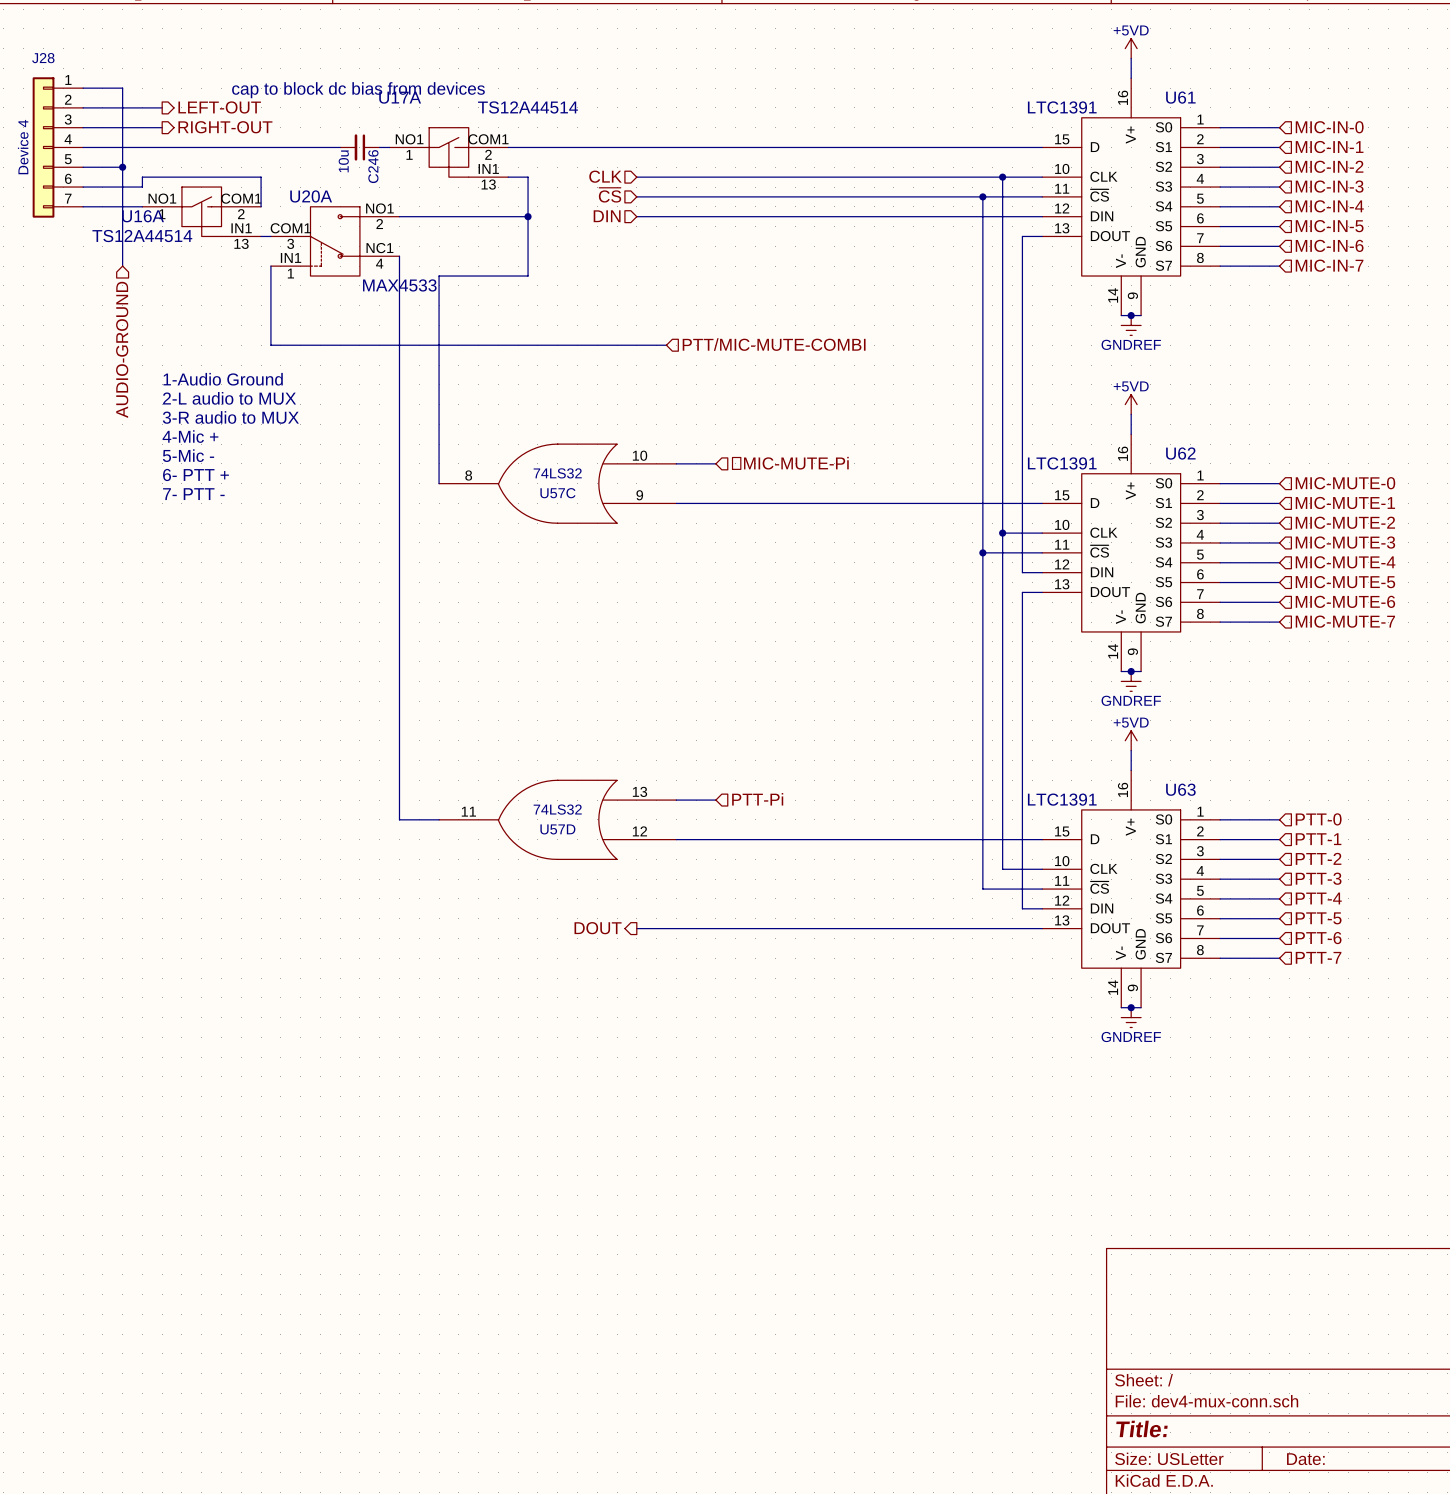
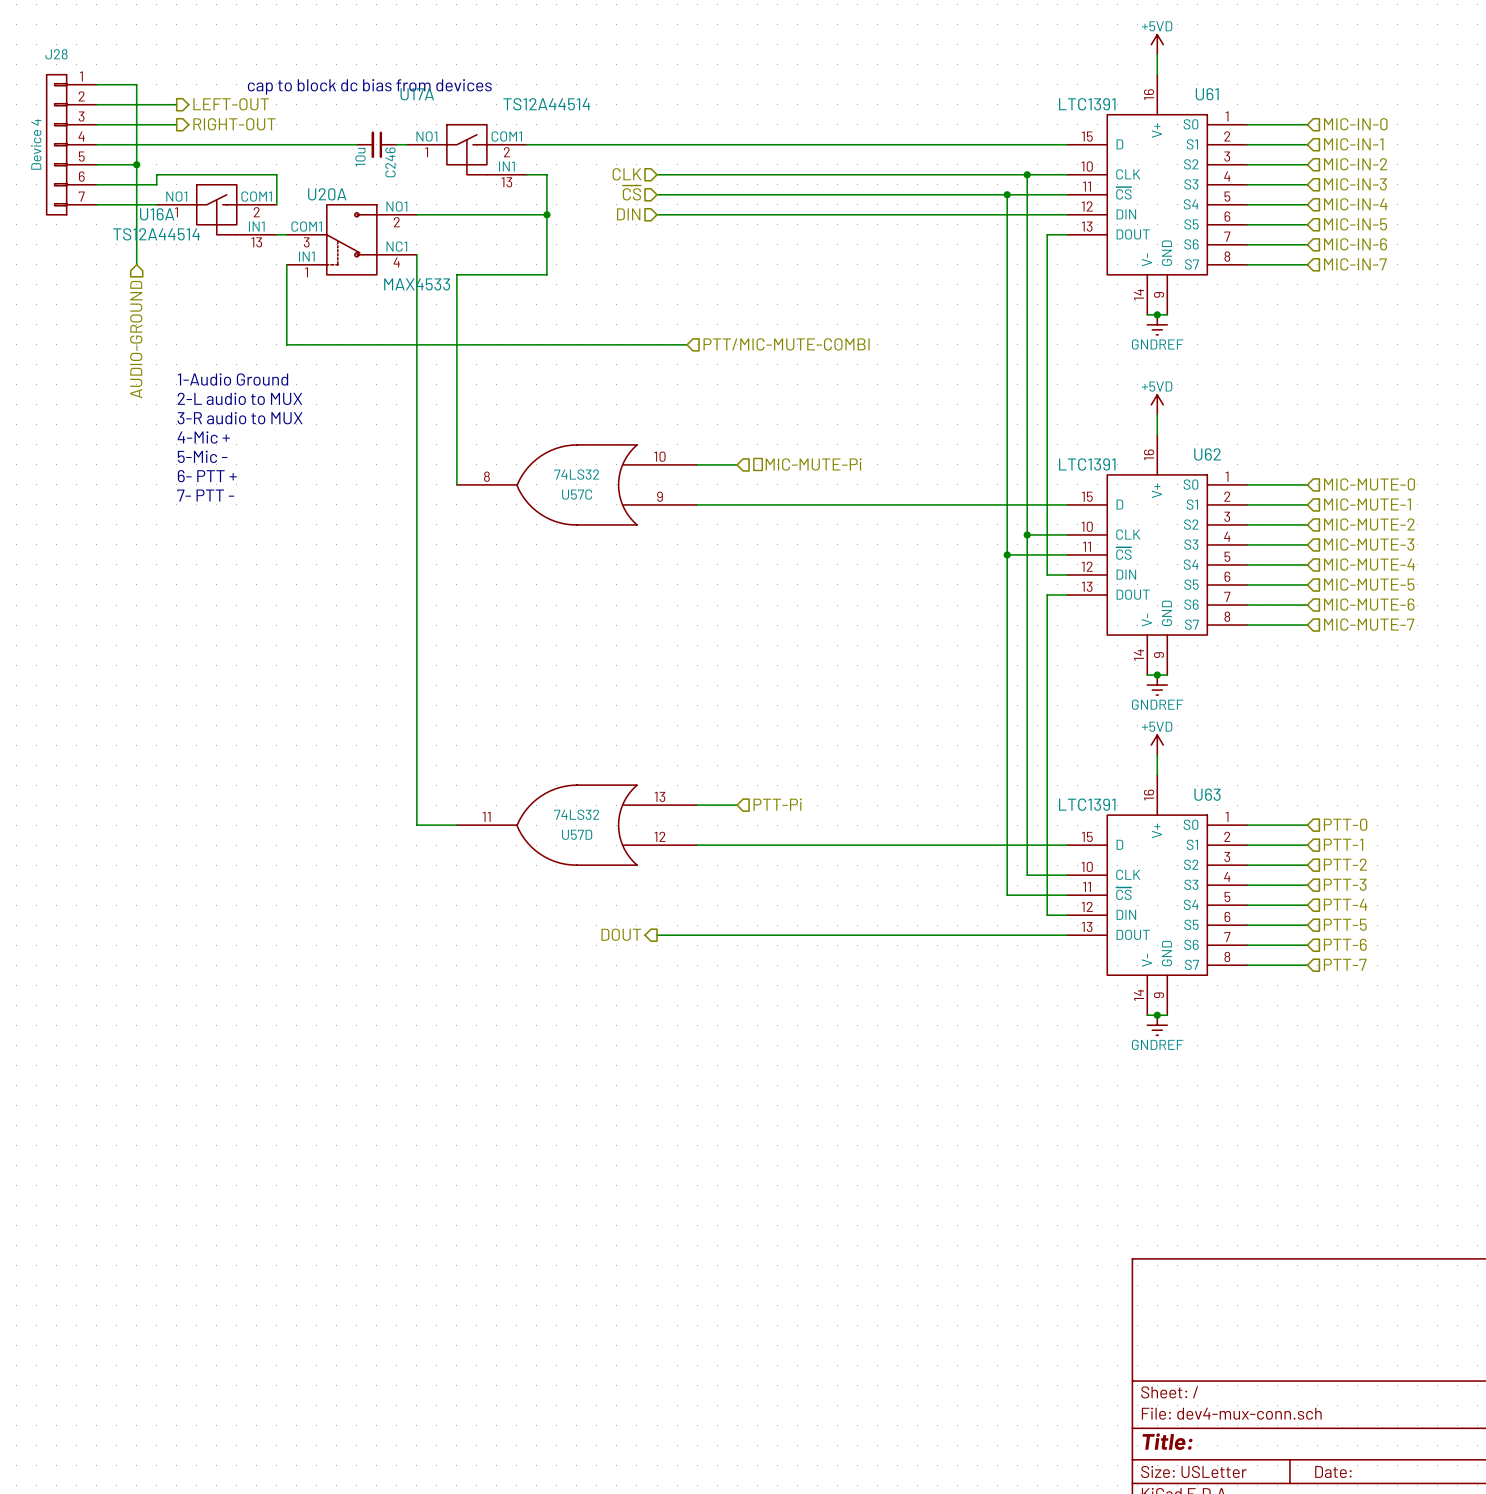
J28 symbol: [32, 77, 84, 218] -> [46, 74, 97, 215]

